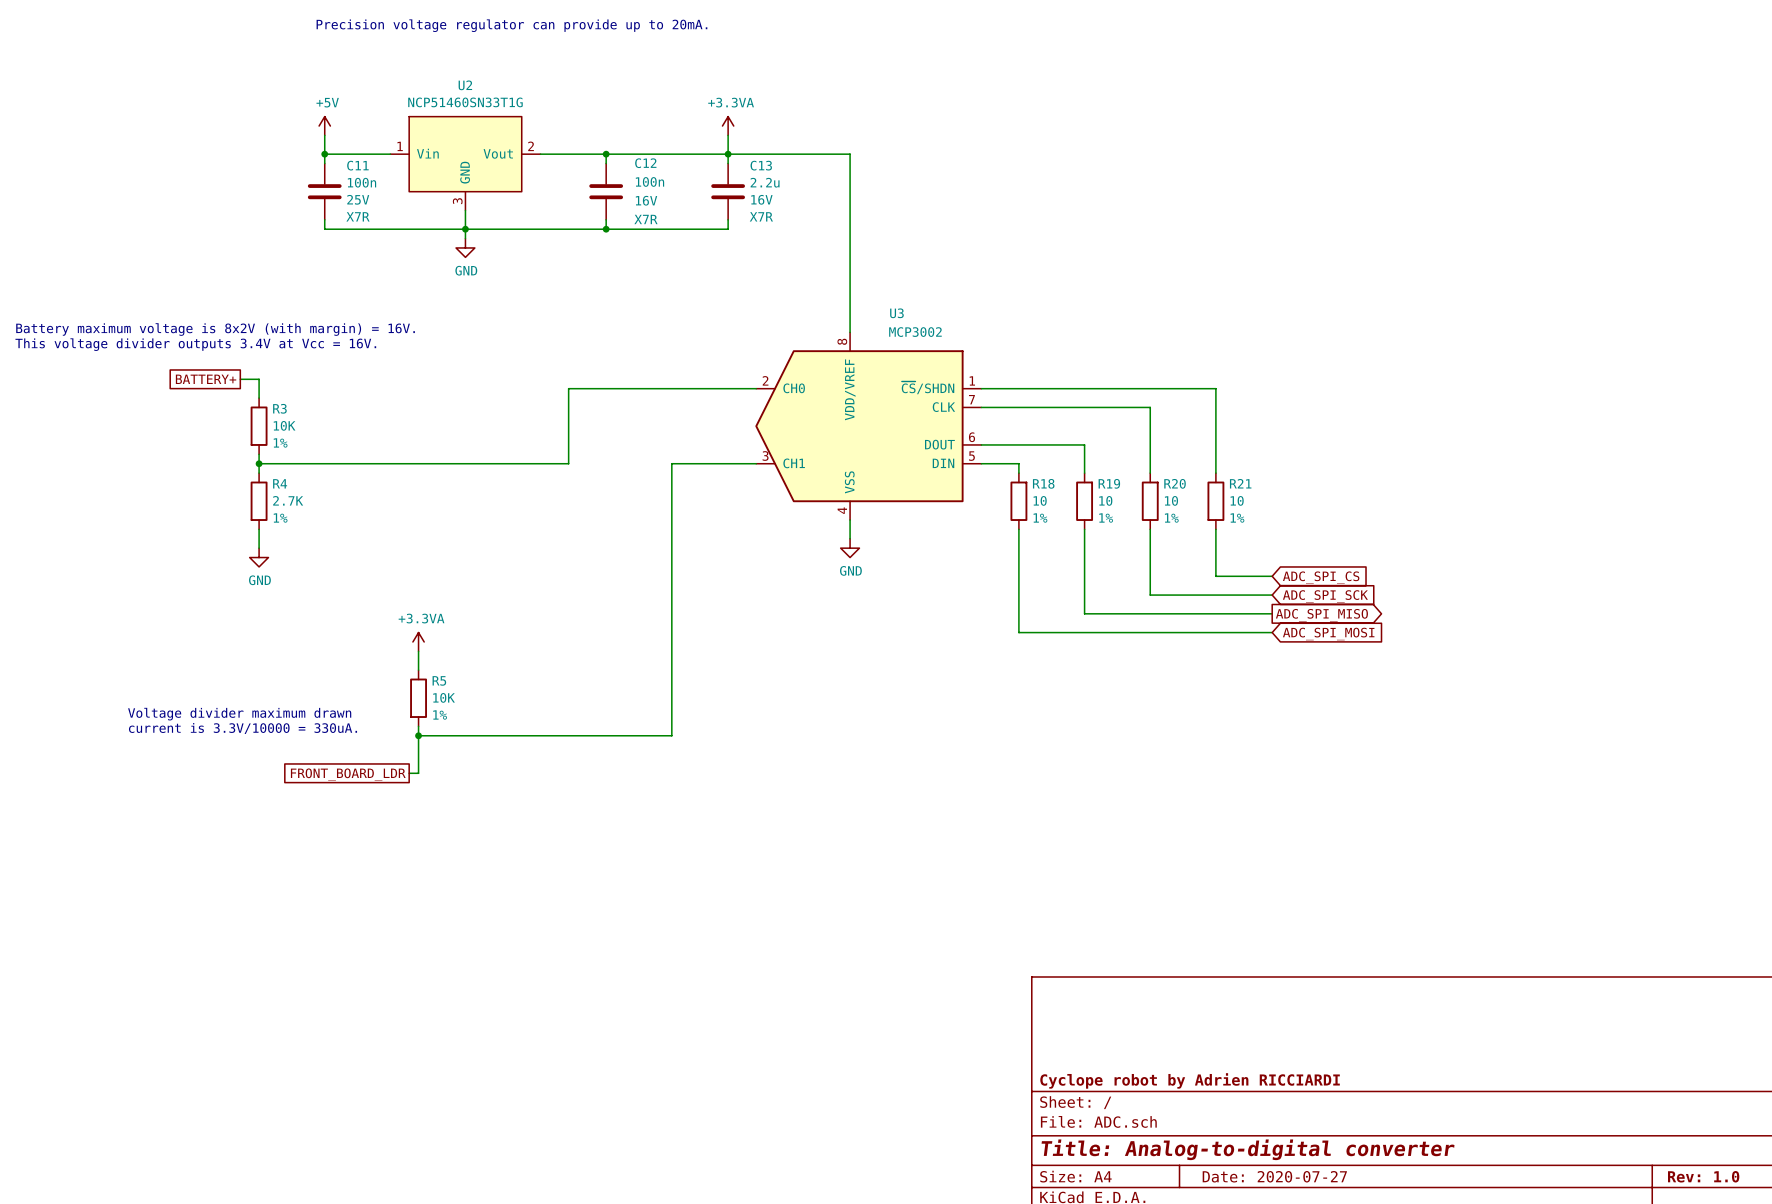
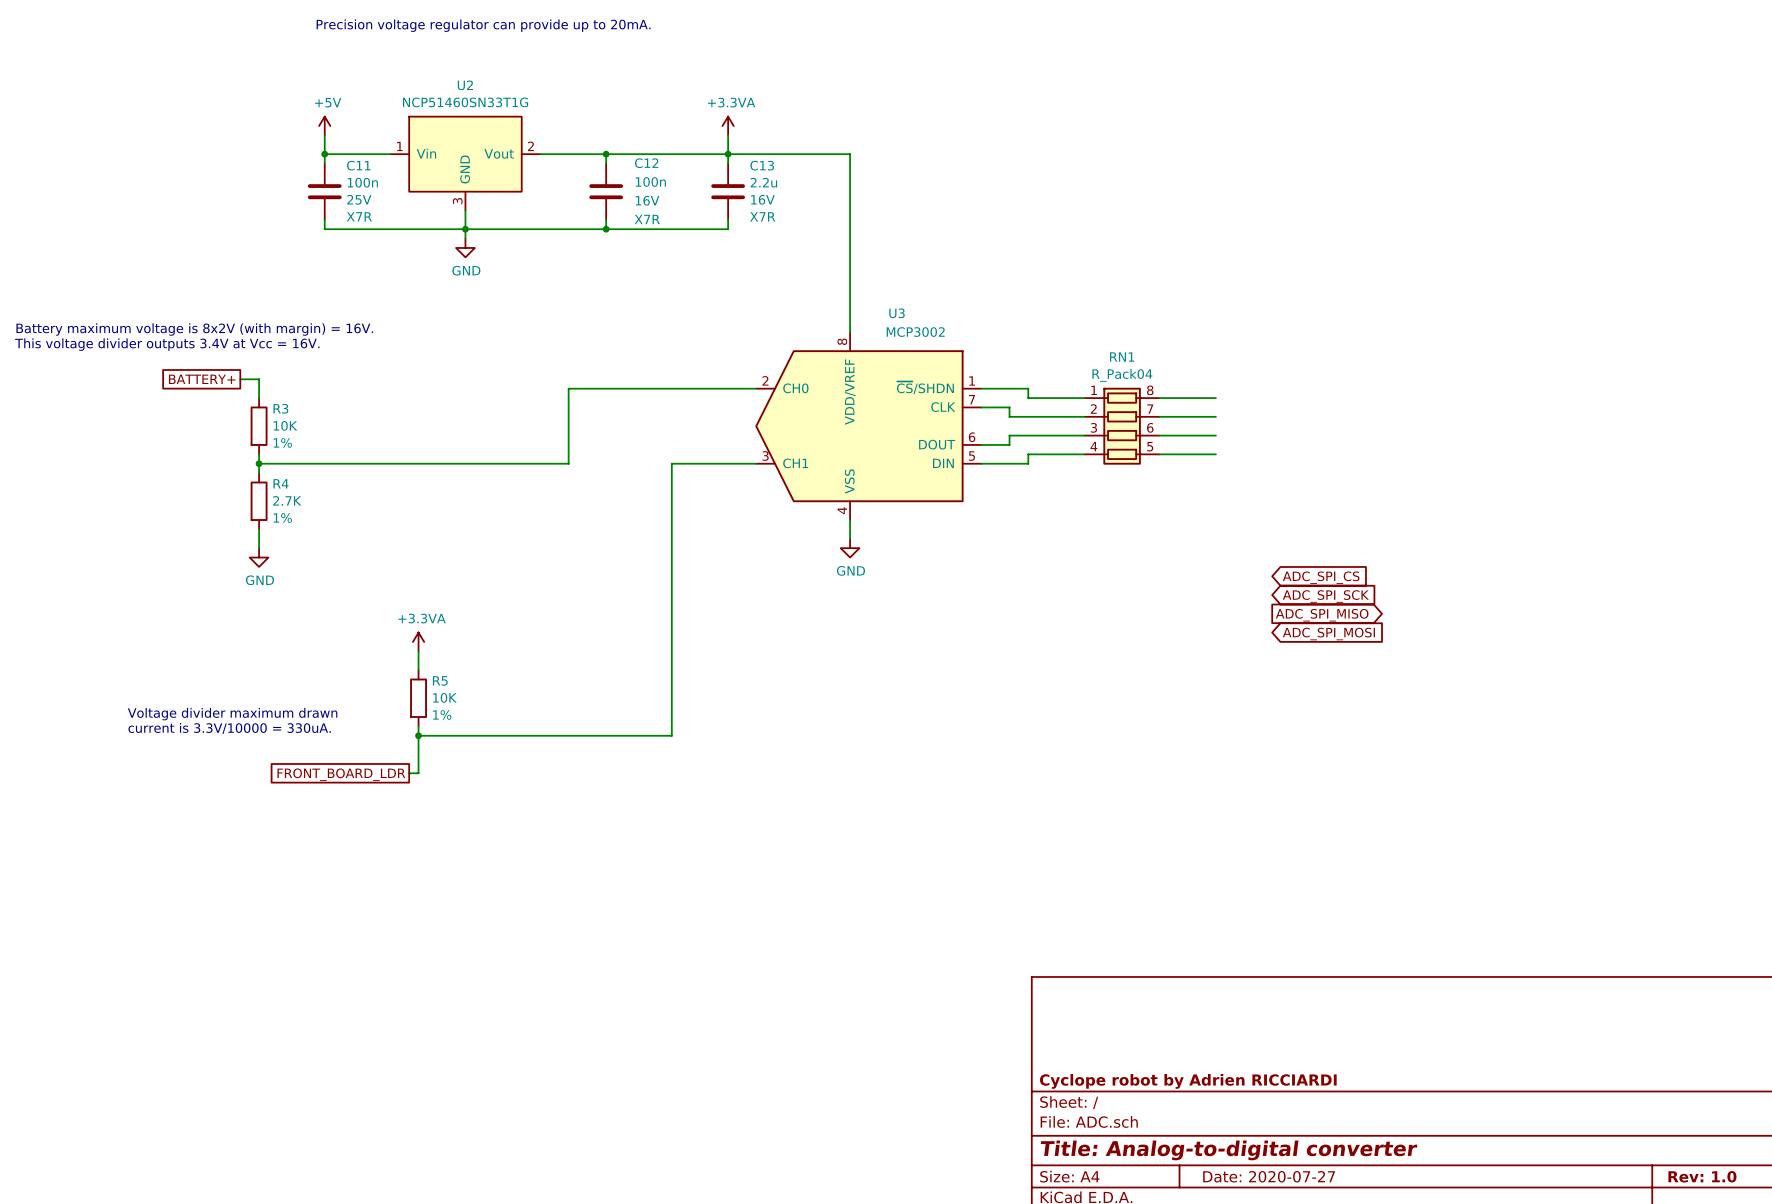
wire: (1028, 388) (1215, 388) (1215, 473) -> (1028, 388) (1028, 398) (1084, 398)
wire: none -> (1159, 398) (1215, 398)
wire: (1009, 407) (1150, 407) (1150, 473) -> (1009, 407) (1009, 416) (1084, 416)
wire: none -> (1159, 416) (1215, 416)
RN1: none -> R_Pack04 (1122, 426)
wire: none -> (1159, 435) (1215, 435)
wire: (1009, 444) (1084, 444) (1084, 473) -> (1009, 444) (1009, 435) (1084, 435)
wire: none -> (1159, 454) (1215, 454)
wire: (1018, 463) (1018, 473) -> (1018, 463) (1028, 463) (1028, 454) (1084, 454)
R18: 10 (1018, 501) -> none
R19: 10 (1084, 501) -> none
R20: 10 (1150, 501) -> none
R21: 10 (1215, 501) -> none
wire: (1018, 529) (1018, 632) (1272, 632) -> none
wire: (1084, 529) (1084, 613) (1272, 613) -> none
wire: (1150, 529) (1150, 595) (1272, 595) -> none
wire: (1215, 529) (1215, 576) (1272, 576) -> none

